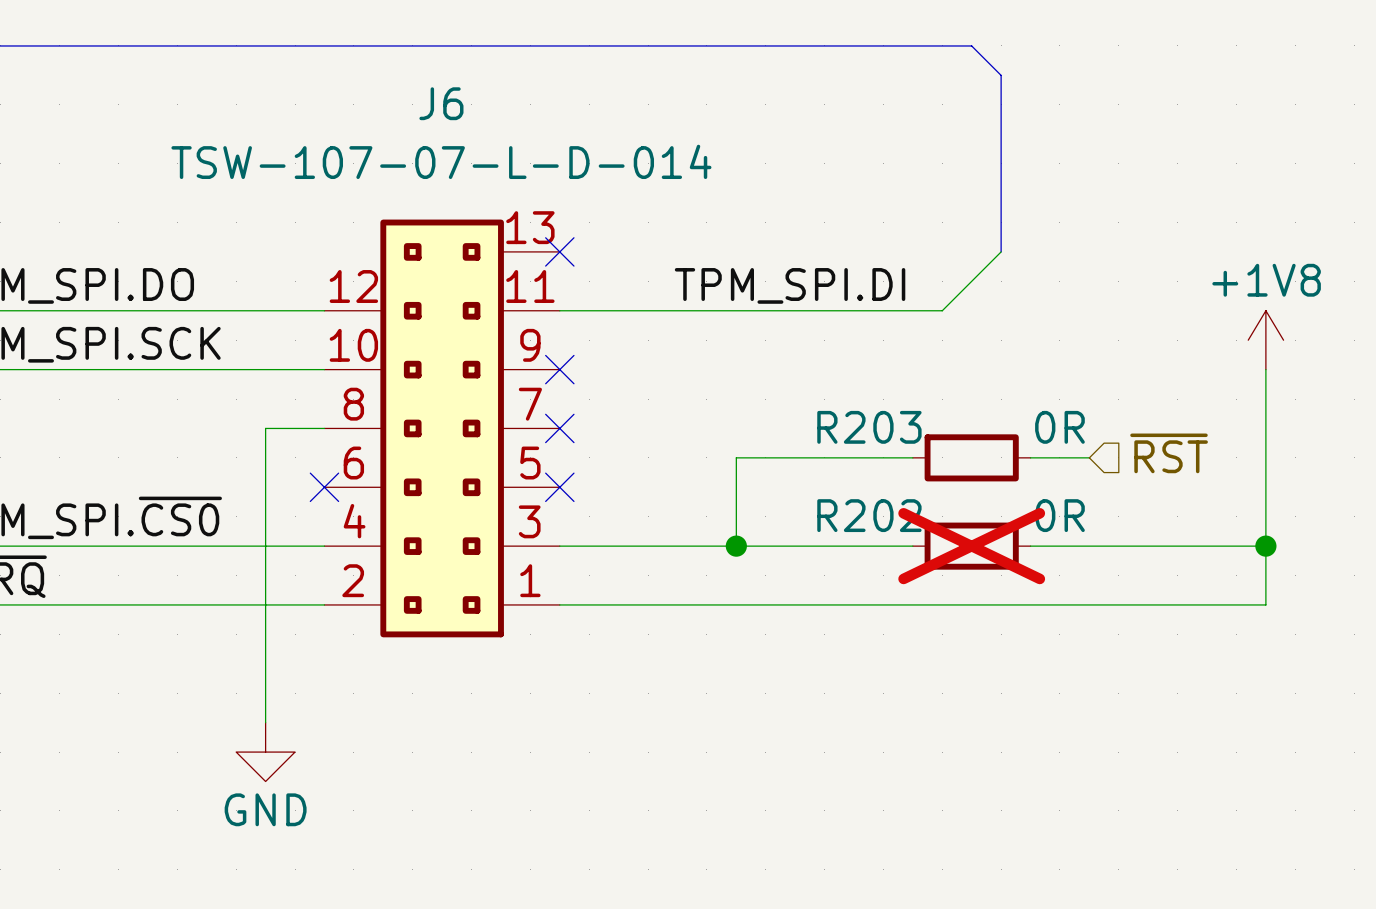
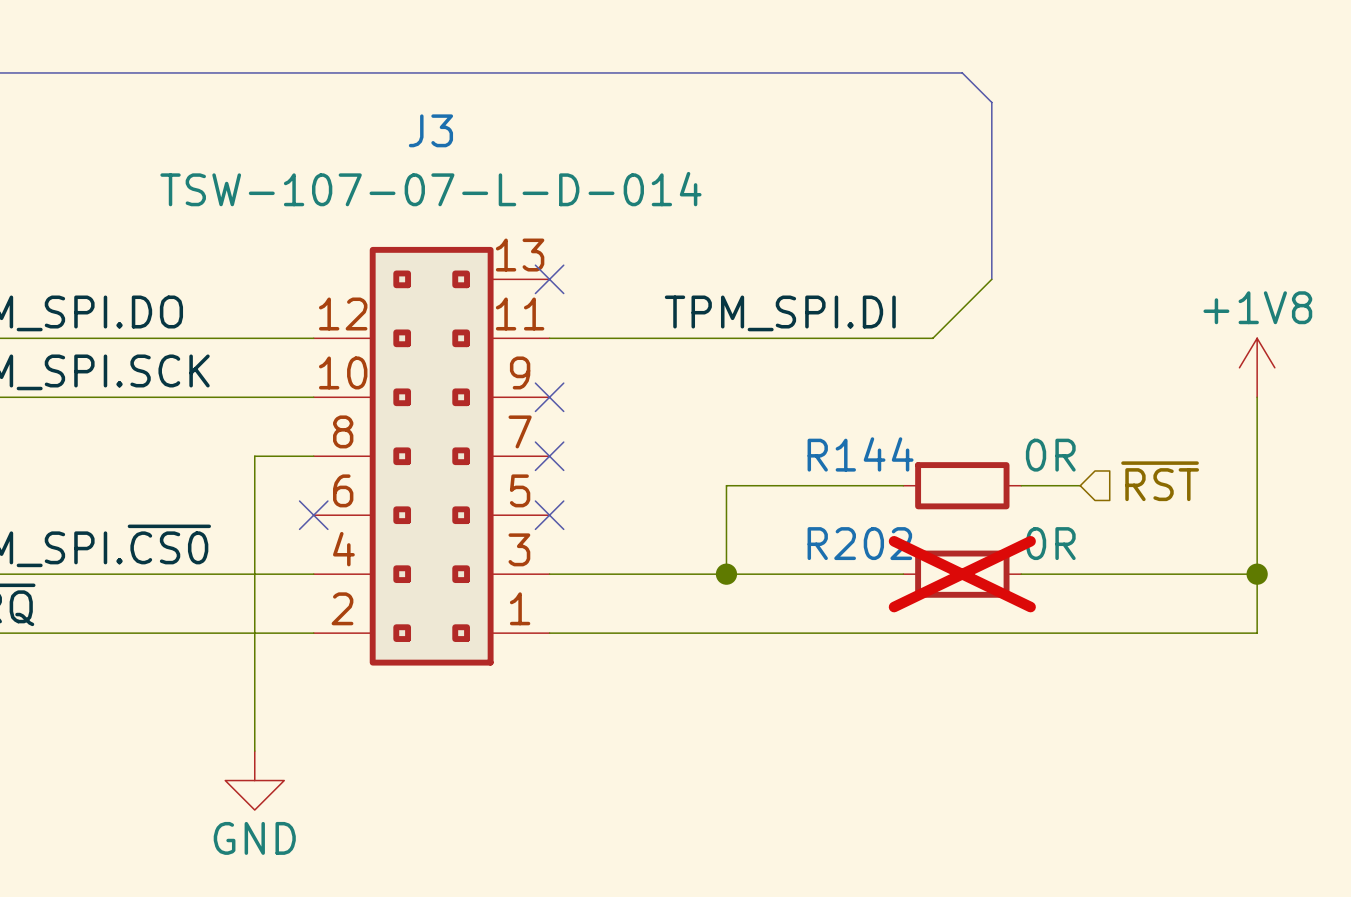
J6 name: J6 (441, 103) -> J3 (430, 130)
R203 name: R203 (869, 427) -> R144 (860, 454)

